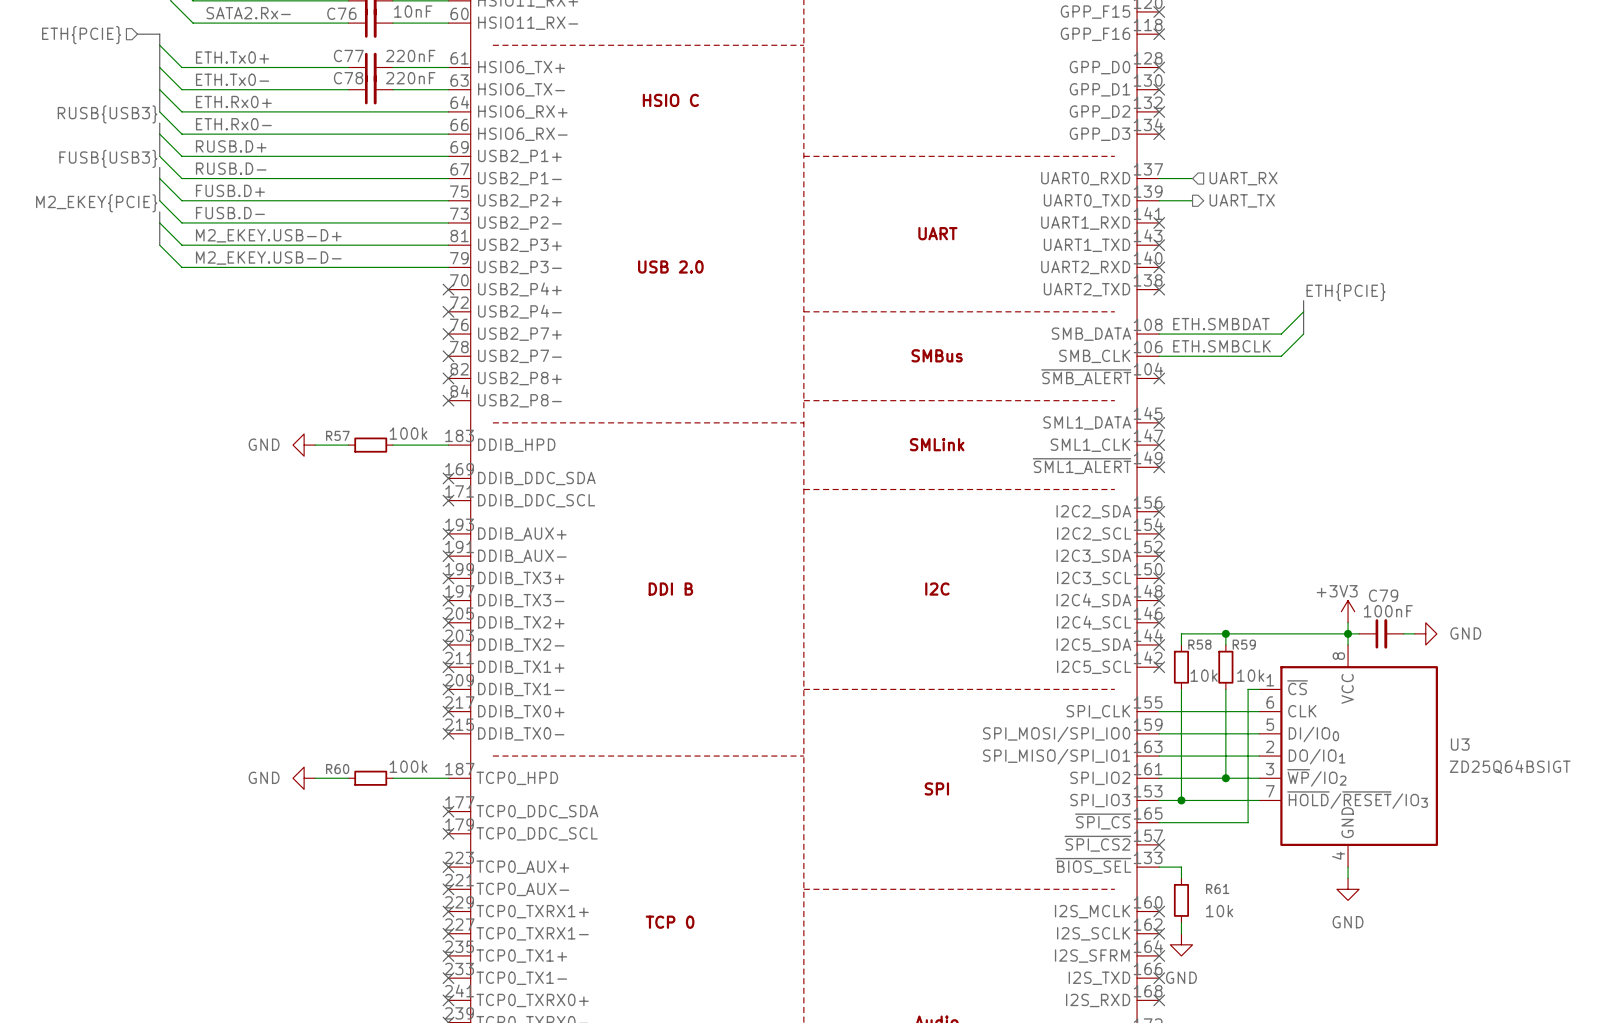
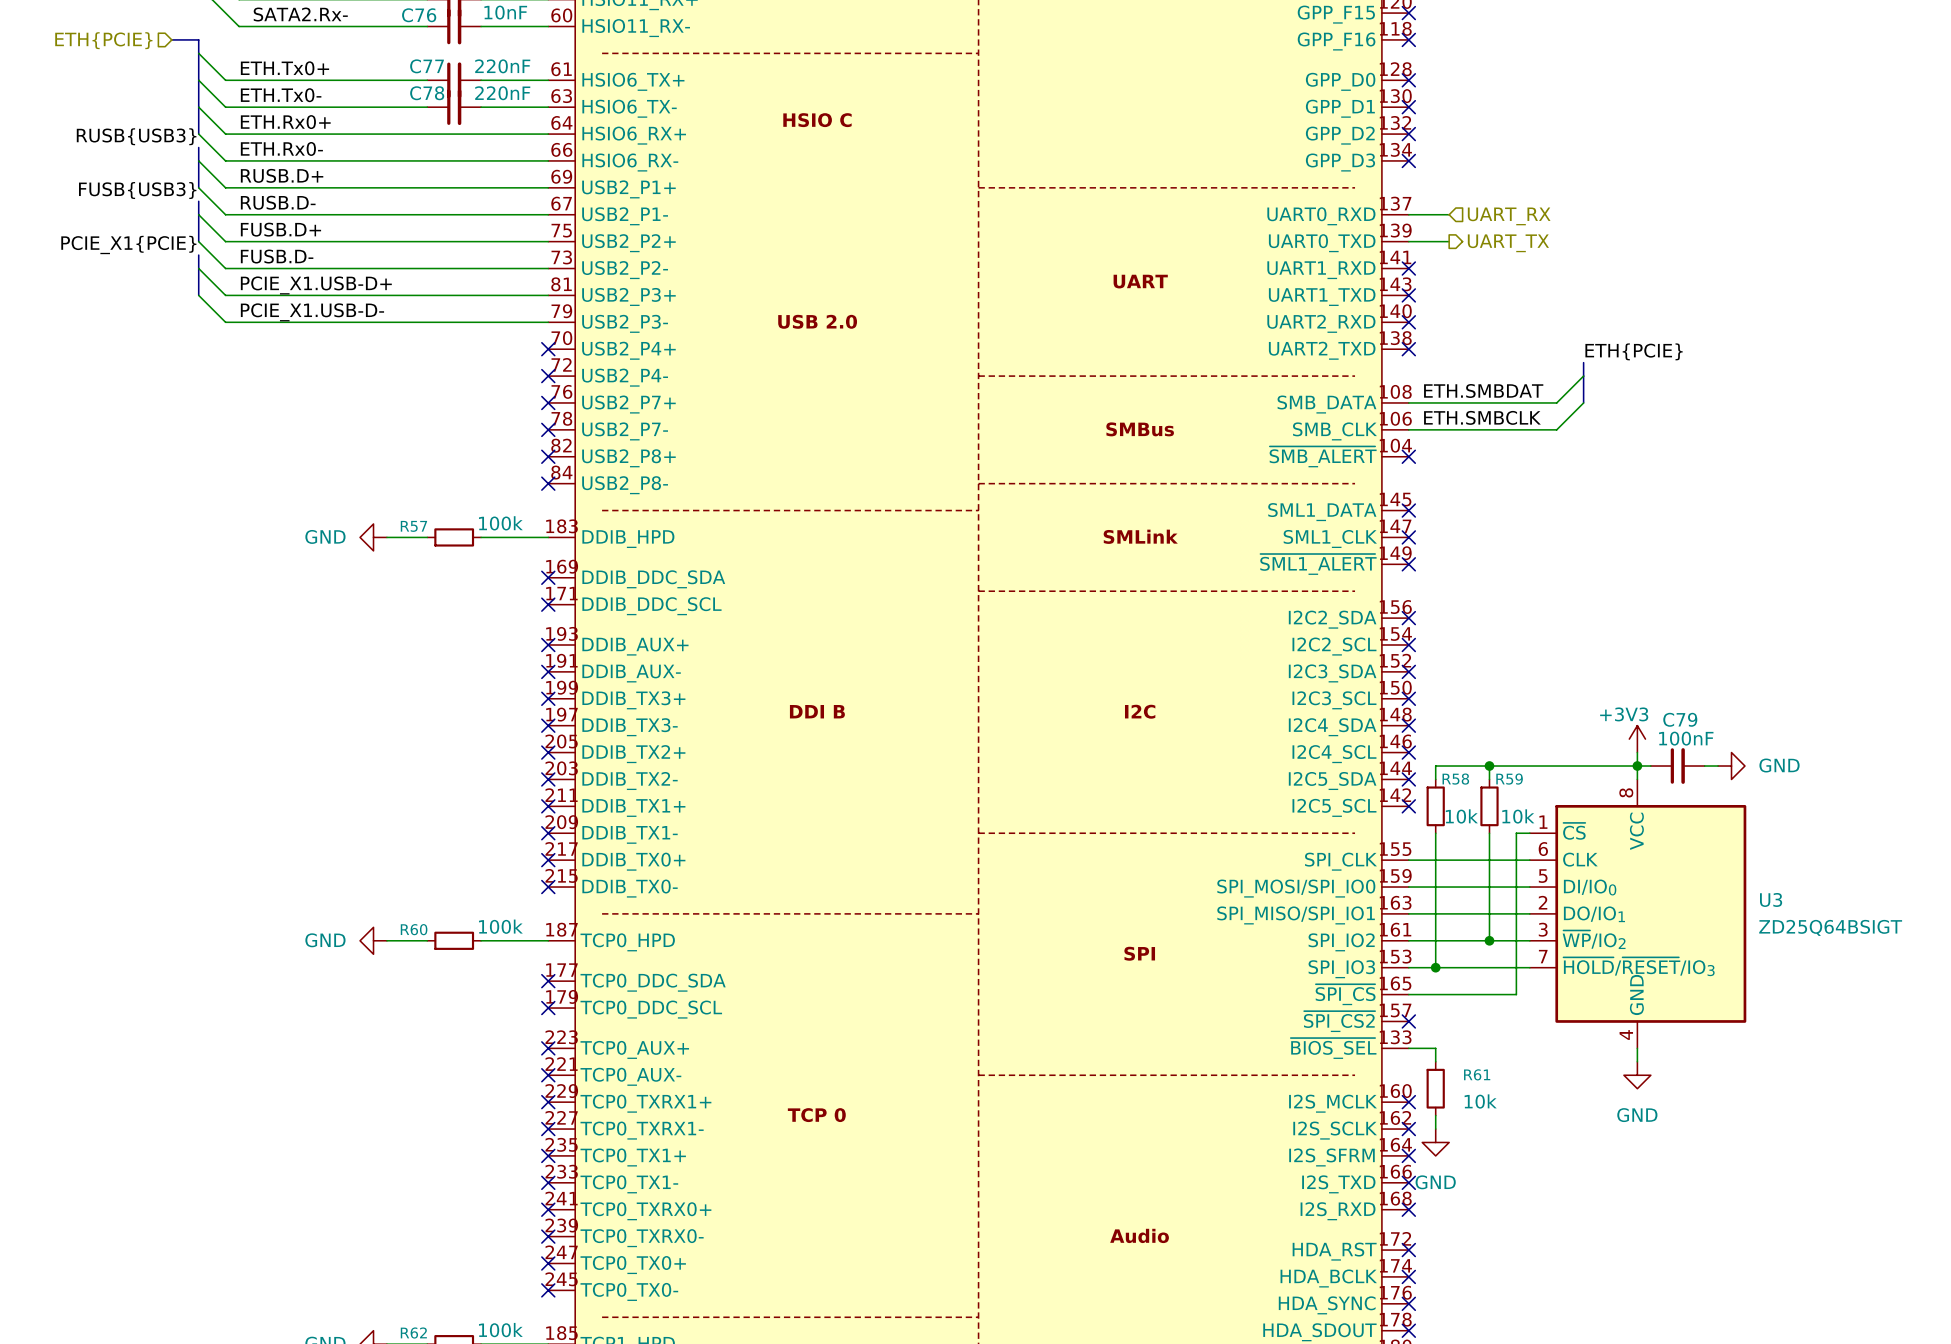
label: M2_EKEY{PCIE} (96, 203) -> PCIE_X1{PCIE} (128, 244)
label: M2_EKEY.USB-D+ (268, 235) -> PCIE_X1.USB-D+ (316, 285)
label: M2_EKEY.USB-D- (268, 258) -> PCIE_X1.USB-D- (312, 312)

